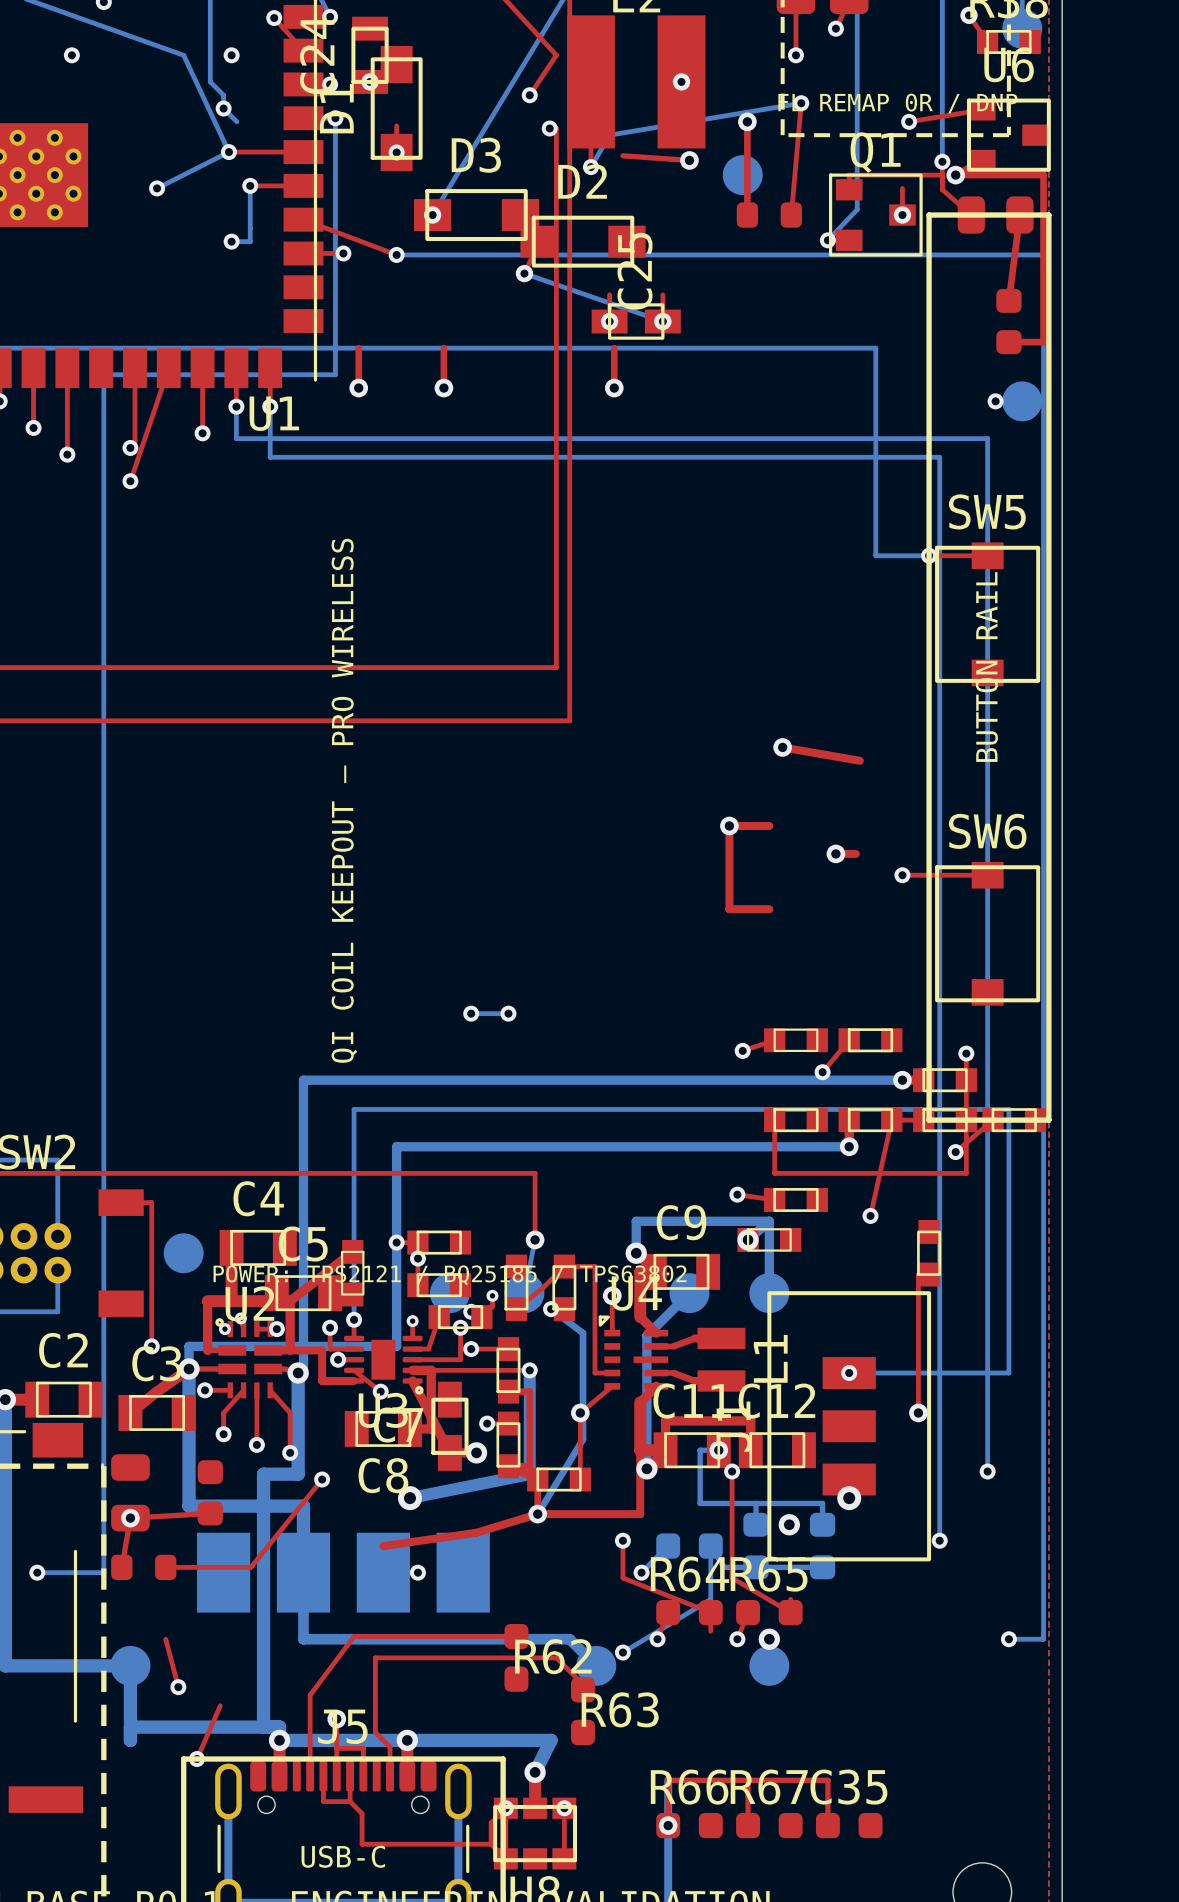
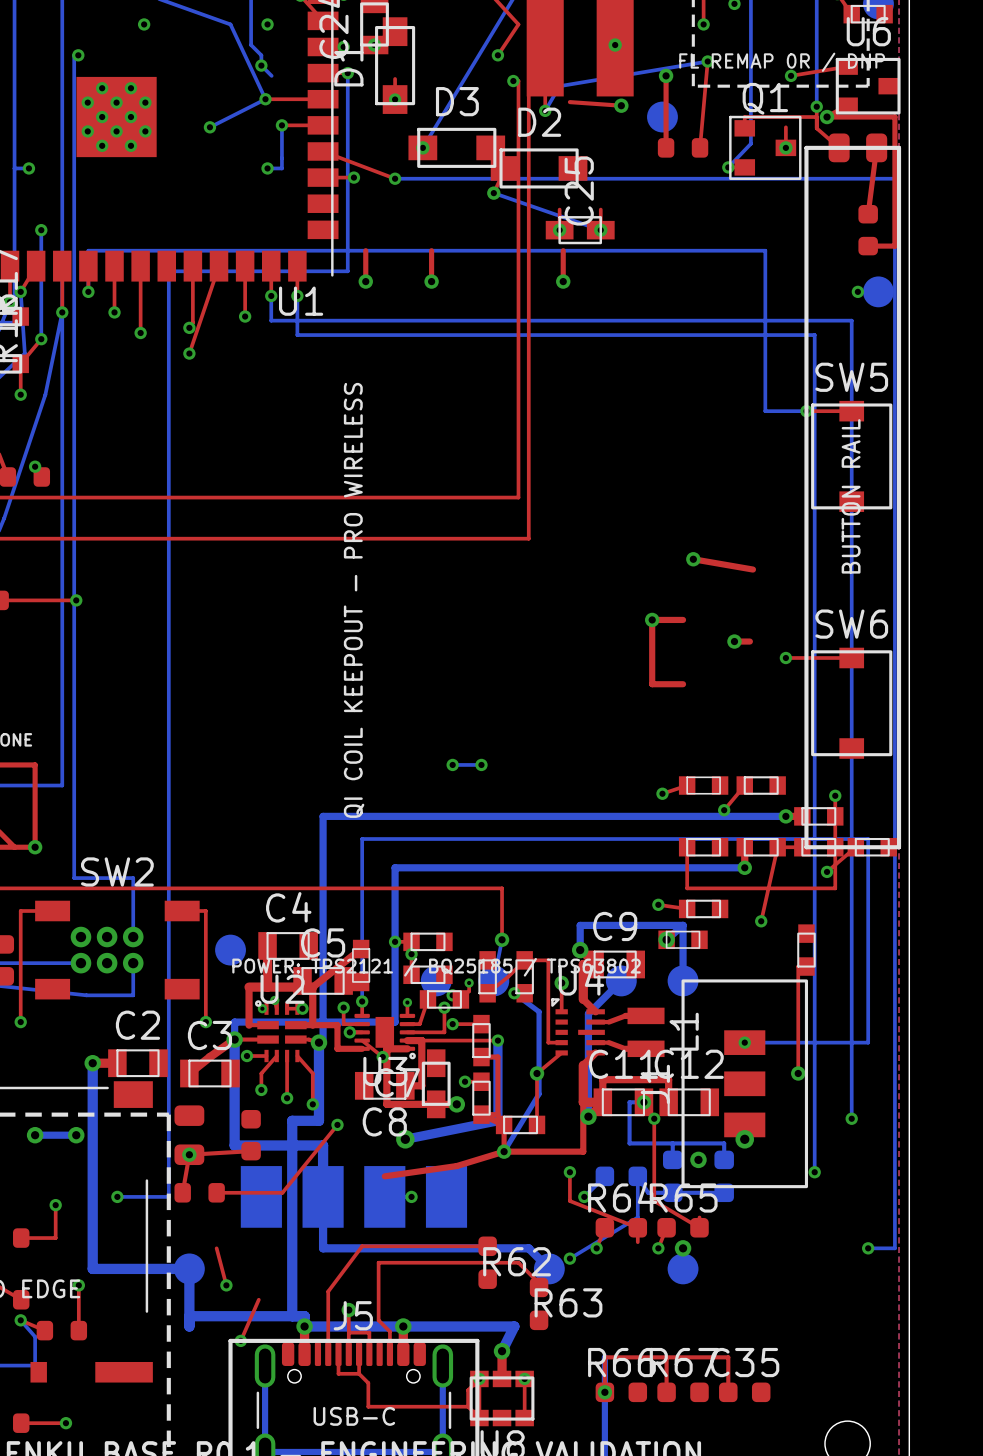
top track: (412, 1381) (449, 1452) -> (407, 1048) (386, 1048) (386, 1104) (436, 1104)

